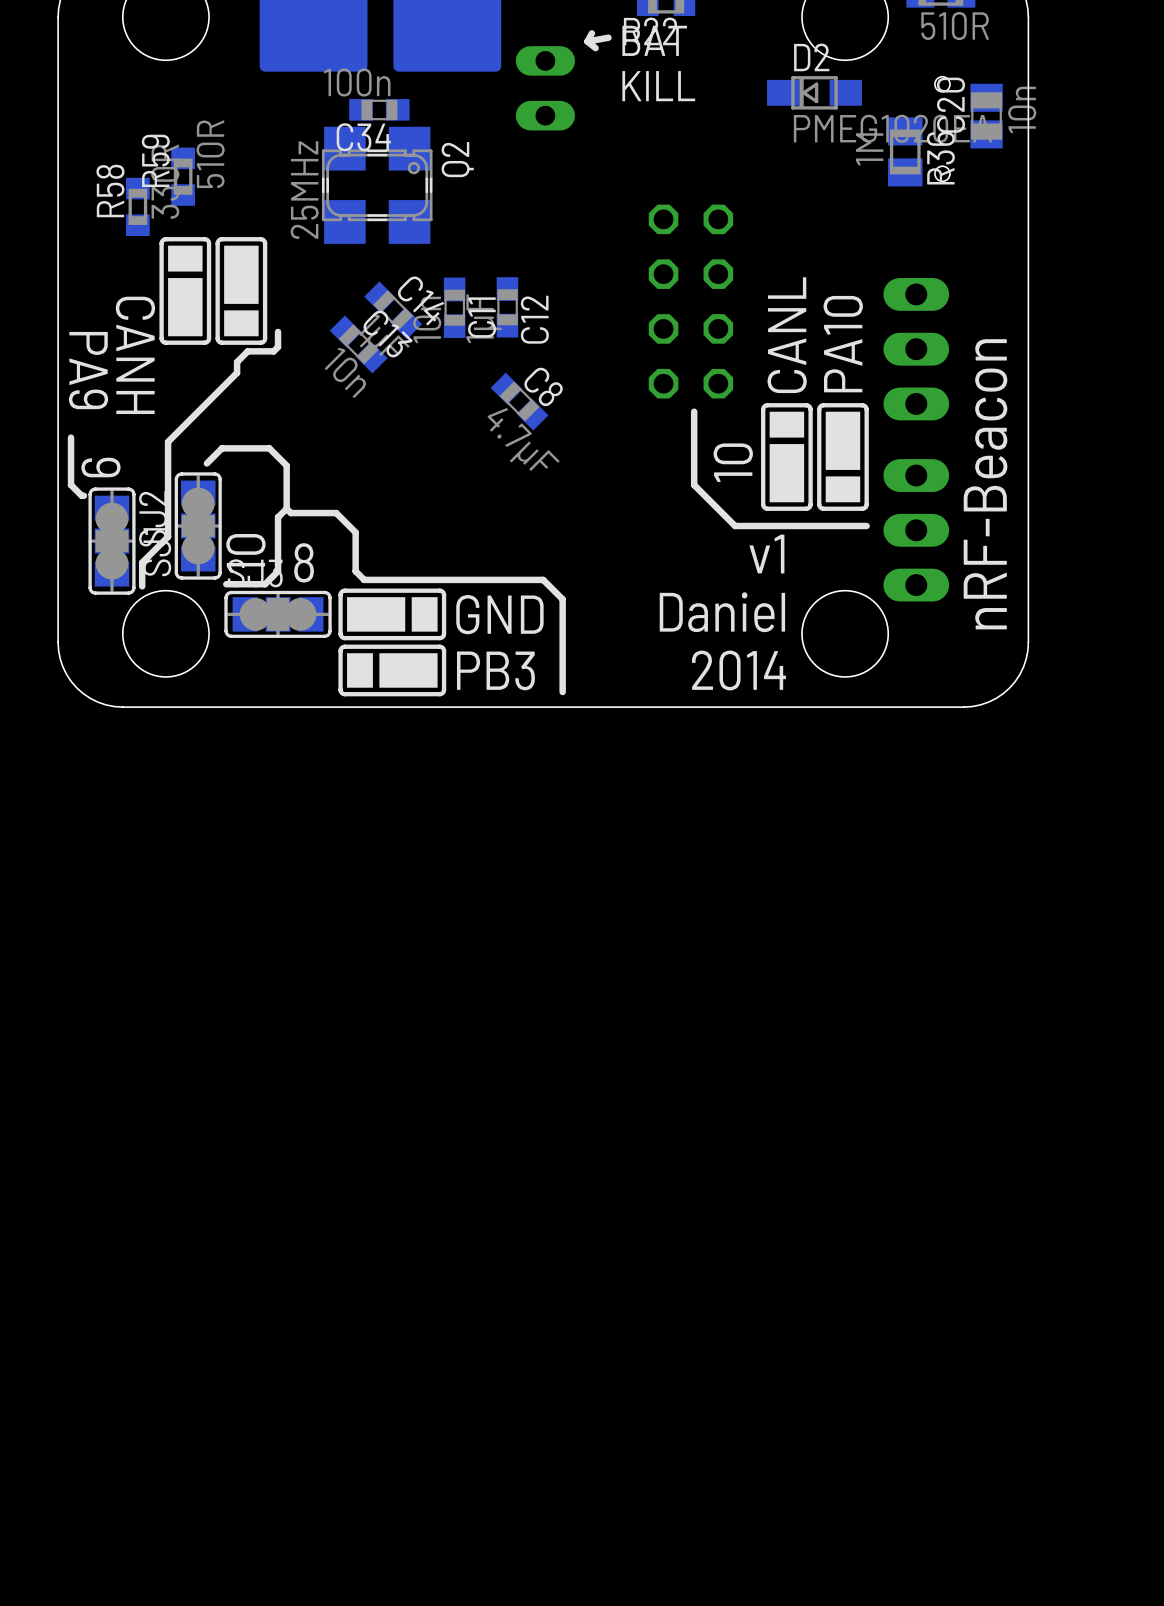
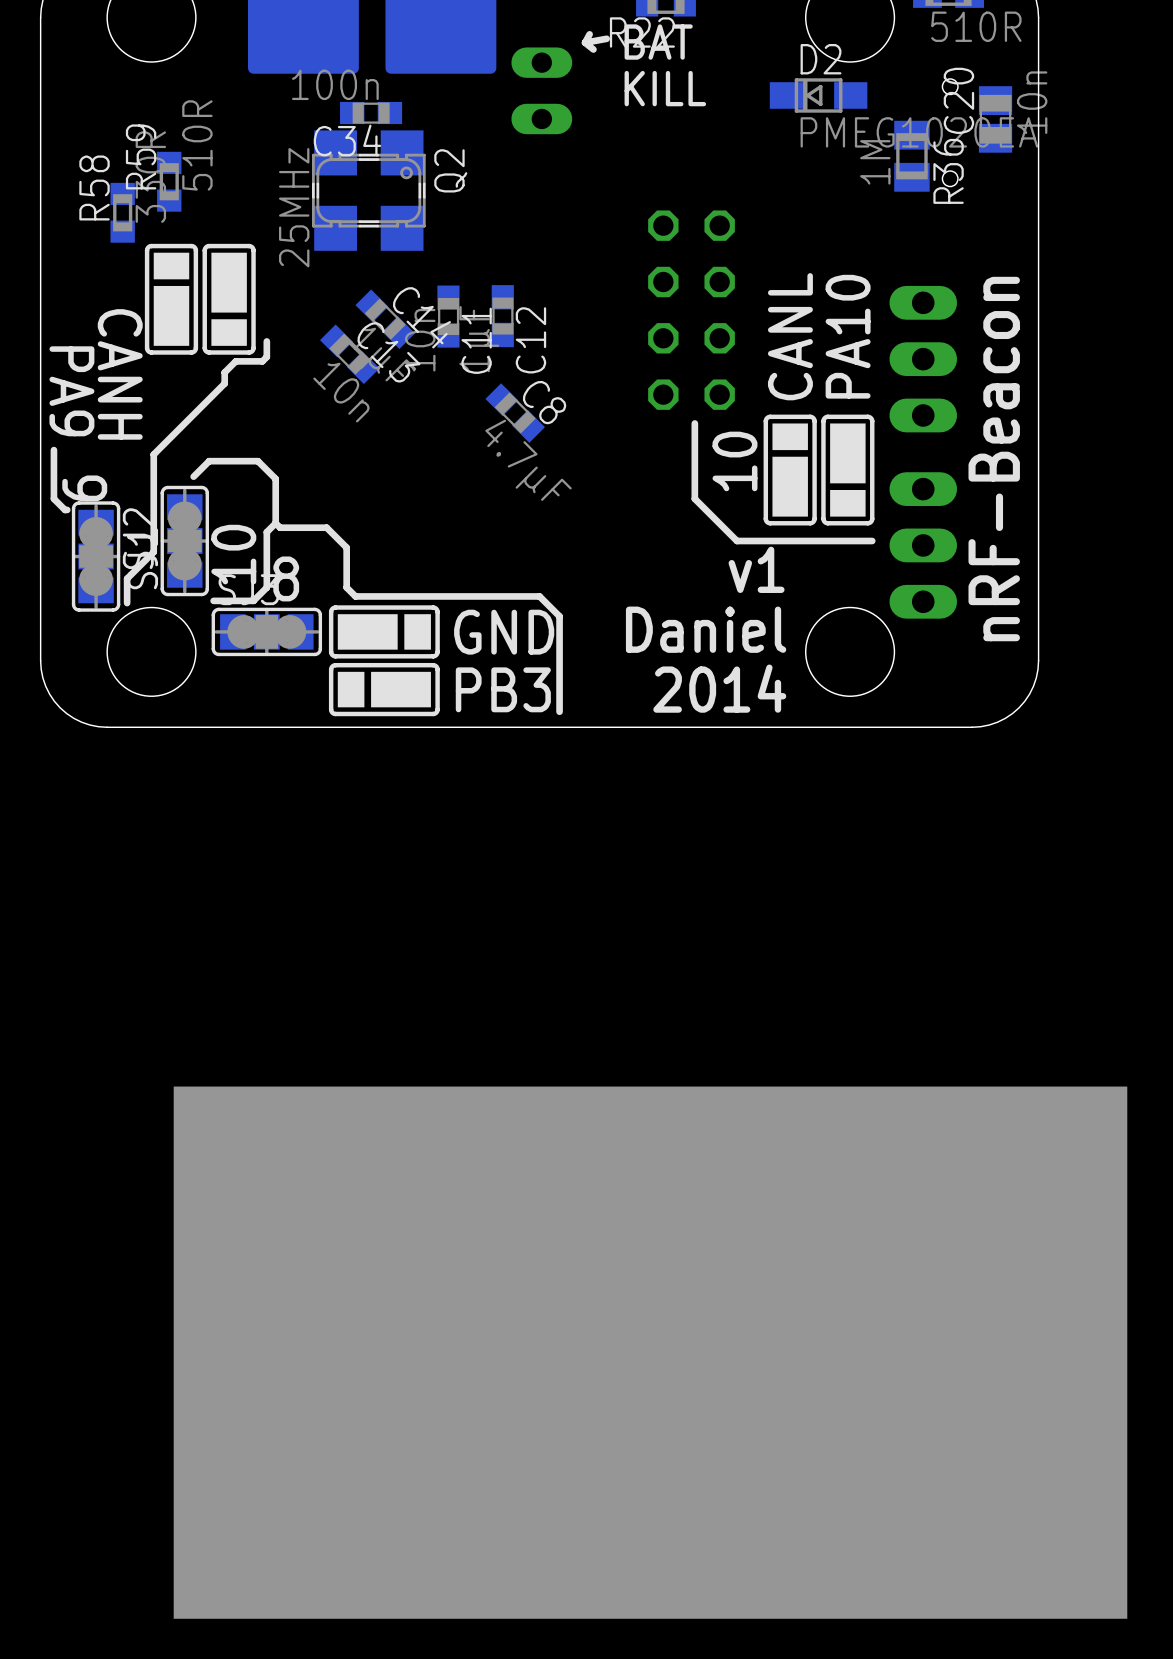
drawing: none -> [173, 1086, 1128, 1619]

